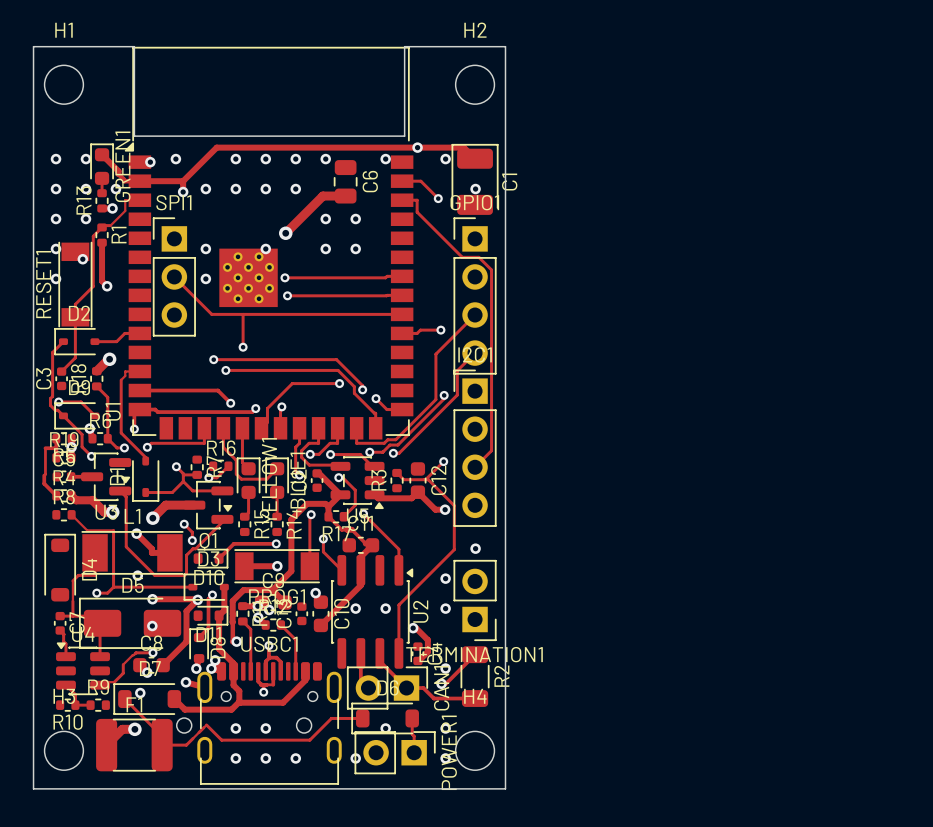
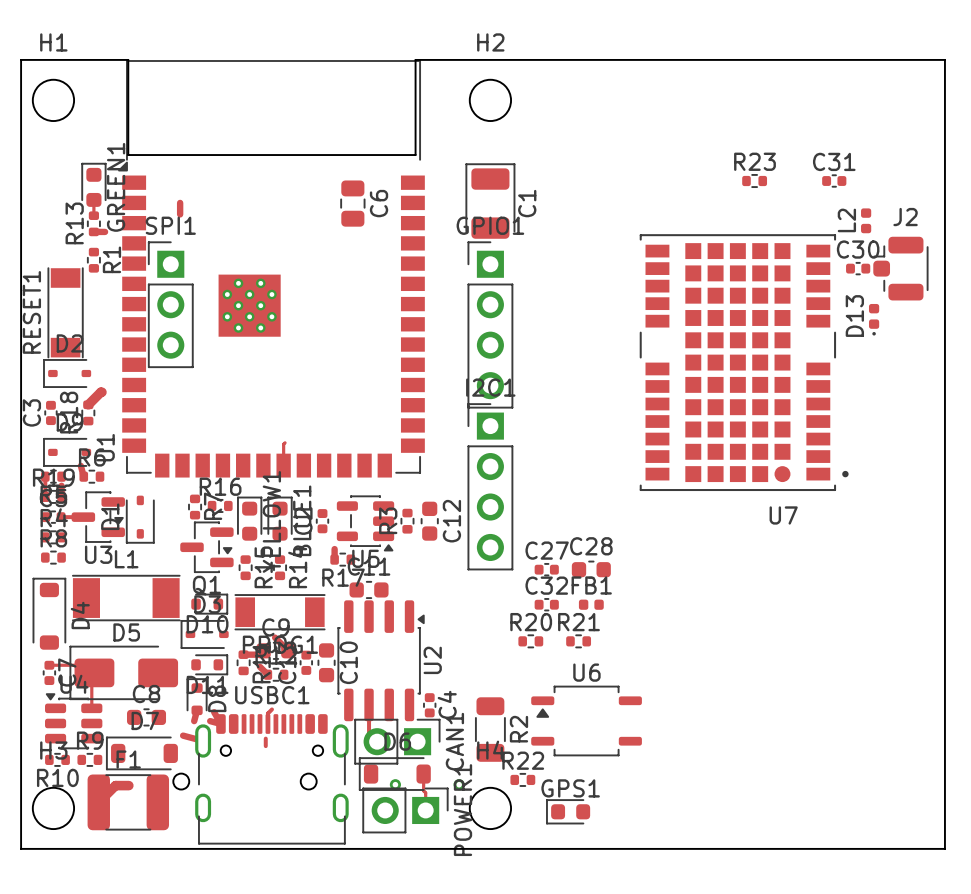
board edge: (505, 46) (505, 788) -> (522, 59) (944, 59) (944, 848) (522, 848)
via: (417, 147) -> none
track: (102, 154) (118, 171) (124, 181) (183, 181) (216, 147) (463, 147) (475, 158) -> none
via: (56, 159) -> none
via: (85, 159) -> none
via: (175, 159) -> none
via: (235, 159) -> none
via: (265, 159) -> none
via: (295, 159) -> none
via: (325, 159) -> none
via: (385, 159) -> none
via: (445, 159) -> none
R23: none -> (754, 181)
C31: none -> (834, 181)
via: (150, 162) -> none
track: (402, 181) (420, 181) (438, 198) -> none
via: (56, 189) -> none
via: (85, 189) -> none
via: (115, 189) -> none
via: (205, 189) -> none
via: (235, 189) -> none
via: (265, 189) -> none
via: (295, 189) -> none
via: (475, 189) -> none
via: (183, 192) -> none
track: (345, 196) (322, 196) (285, 233) -> none
via: (438, 198) -> none
L2: none -> (866, 220)
track: (139, 200) (125, 200) (125, 210) (110, 225) (103, 225) (93, 236) (93, 286) (75, 304) (75, 357) (61, 371) -> none
track: (402, 200) (417, 200) (417, 212) (462, 257) (478, 257) (491, 269) (491, 450) (475, 467) -> none
via: (112, 208) -> none
via: (56, 219) -> none
via: (85, 219) -> none
via: (325, 219) -> none
via: (355, 219) -> none
via: (285, 233) -> none
track: (102, 242) (102, 281) (107, 286) -> none
C30: none -> (858, 268)
J2: none -> (900, 268)
via: (56, 248) -> none
via: (205, 248) -> none
via: (265, 248) -> none
via: (325, 248) -> none
via: (355, 248) -> none
via: (82, 259) -> none
track: (174, 276) (211, 314) (402, 314) -> none
track: (402, 276) (284, 277) -> none
via: (284, 277) -> none
via: (56, 278) -> none
via: (205, 278) -> none
via: (107, 286) -> none
D13: none -> (874, 319)
via: (287, 295) -> none
track: (402, 295) (287, 295) -> none
track: (243, 314) (243, 347) -> none
track: (475, 315) (435, 354) (435, 399) (395, 439) (387, 439) (384, 443) (356, 443) (356, 428) -> none
track: (440, 330) (420, 330) (417, 333) (402, 333) -> none
via: (440, 330) -> none
U7: none -> (744, 362)
track: (139, 333) (124, 333) (116, 341) (94, 341) -> none
track: (63, 341) (52, 352) (52, 396) (50, 398) (50, 405) (82, 434) (82, 446) (91, 456) -> none
via: (243, 347) -> none
track: (475, 353) (457, 370) (457, 395) (399, 453) (393, 453) -> none
via: (109, 359) -> none
track: (213, 359) (336, 359) (362, 385) (362, 389) -> none
via: (213, 359) -> none
track: (225, 370) (338, 370) (354, 386) (354, 393) (375, 413) (375, 428) -> none
via: (225, 370) -> none
track: (139, 371) (125, 371) (125, 375) (121, 380) (121, 432) (145, 457) (145, 461) -> none
track: (339, 383) (292, 383) (267, 408) (267, 422) (261, 428) -> none
via: (339, 383) -> none
track: (96, 386) (107, 397) (107, 438) (117, 447) (124, 447) -> none
via: (362, 389) -> none
track: (139, 390) (217, 390) (230, 403) -> none
track: (444, 395) (444, 398) (397, 445) (389, 445) (382, 452) (369, 452) -> none
via: (444, 395) -> none
track: (376, 398) (386, 409) (402, 409) -> none
via: (376, 398) -> none
track: (58, 402) (81, 402) (94, 415) -> none
via: (58, 402) -> none
via: (230, 403) -> none
via: (281, 406) -> none
track: (255, 408) (252, 412) (157, 412) (155, 409) (139, 409) (134, 415) (134, 429) -> none
via: (255, 408) -> none
via: (89, 428) -> none
track: (204, 428) (204, 443) (151, 443) (147, 447) -> none
track: (223, 428) (223, 447) (236, 460) (236, 474) (241, 479) (266, 479) (277, 468) -> none
track: (242, 428) (242, 462) (248, 468) -> none
track: (299, 428) (299, 443) (295, 447) (295, 471) (299, 475) -> none
track: (318, 428) (318, 443) (309, 443) (301, 450) (301, 457) (309, 465) (340, 466) -> none
track: (337, 428) (337, 443) (330, 443) (319, 454) (310, 454) -> none
via: (134, 429) -> none
via: (71, 447) -> none
via: (124, 447) -> none
via: (147, 447) -> none
track: (56, 448) (45, 448) (44, 483) (56, 495) -> none
via: (369, 452) -> none
via: (393, 453) -> none
via: (310, 454) -> none
track: (330, 454) (360, 454) (372, 466) (374, 466) -> none
via: (330, 454) -> none
via: (91, 456) -> none
track: (443, 461) (424, 479) -> none
via: (443, 461) -> none
track: (176, 466) (183, 473) (183, 481) -> none
via: (176, 466) -> none
track: (228, 466) (216, 477) (208, 477) -> none
track: (397, 472) (403, 479) (428, 479) (454, 505) (454, 549) (398, 605) (398, 653) -> none
track: (317, 473) (340, 494) (328, 506) (325, 503) (307, 503) (291, 519) (291, 571) (272, 590) (243, 590) (232, 601) (232, 622) -> none
track: (183, 474) (197, 474) -> none
via: (299, 475) -> none
via: (208, 477) -> none
track: (338, 477) (342, 477) (355, 490) (355, 505) (343, 516) -> none
via: (338, 477) -> none
track: (183, 481) (192, 490) (222, 490) -> none
track: (183, 481) (172, 492) (145, 492) -> none
track: (120, 491) (126, 497) (126, 546) (154, 575) (184, 575) (186, 573) (186, 555) (192, 548) (195, 548) (222, 522) (222, 519) -> none
track: (248, 492) (248, 512) (244, 516) -> none
track: (277, 492) (277, 516) -> none
track: (374, 494) (378, 498) (411, 498) (417, 492) (435, 509) (445, 509) -> none
track: (71, 495) (76, 500) (92, 500) (104, 512) (112, 512) -> none
track: (194, 505) (165, 505) (152, 518) -> none
via: (445, 509) -> none
via: (112, 512) -> none
track: (363, 513) (398, 549) (398, 570) -> none
via: (363, 513) -> none
track: (71, 514) (87, 530) (113, 530) (113, 587) -> none
track: (311, 514) (309, 566) -> none
via: (311, 514) -> none
track: (328, 516) (341, 529) (347, 529) -> none
via: (152, 518) -> none
track: (184, 524) (192, 532) (192, 540) -> none
via: (184, 524) -> none
C27: none -> (546, 569)
C28: none -> (591, 569)
track: (347, 529) (351, 529) (365, 543) (372, 545) (360, 556) (360, 585) (320, 625) -> none
track: (136, 533) (151, 548) (151, 552) (169, 552) -> none
via: (136, 533) -> none
track: (323, 538) (323, 551) (341, 570) -> none
via: (323, 538) -> none
via: (192, 540) -> none
track: (276, 543) (233, 543) (219, 558) -> none
via: (276, 543) -> none
via: (475, 548) -> none
track: (95, 552) (95, 575) (78, 575) (72, 580) (72, 616) -> none
C32: none -> (546, 604)
FB1: none -> (591, 604)
track: (244, 566) (277, 566) -> none
via: (277, 566) -> none
via: (137, 575) -> none
via: (445, 578) -> none
track: (113, 587) (107, 593) (96, 593) -> none
track: (113, 587) (192, 587) -> none
track: (224, 587) (224, 610) (219, 615) (219, 648) (233, 663) (233, 685) (239, 691) (239, 701) -> none
via: (96, 593) -> none
via: (315, 593) -> none
R20: none -> (530, 641)
R21: none -> (578, 641)
track: (212, 595) (208, 598) (208, 628) (199, 637) -> none
via: (212, 595) -> none
track: (152, 599) (197, 599) (186, 611) (186, 641) (163, 665) -> none
via: (152, 599) -> none
via: (197, 599) -> none
TERMINATION1: (475, 600) -> none
via: (257, 606) -> none
via: (355, 608) -> none
via: (385, 608) -> none
via: (445, 608) -> none
via: (269, 609) -> none
via: (258, 617) -> none
track: (242, 621) (250, 629) (250, 671) -> none
track: (232, 622) (232, 641) (236, 641) -> none
track: (280, 625) (295, 639) (295, 671) -> none
via: (152, 626) -> none
track: (413, 628) (416, 628) (427, 640) (427, 651) (417, 660) -> none
via: (413, 628) -> none
track: (60, 630) (64, 634) (65, 656) -> none
via: (236, 641) -> none
track: (268, 645) (268, 657) (276, 657) (280, 661) (280, 671) -> none
via: (268, 645) -> none
track: (153, 652) (136, 652) (123, 664) (123, 673) (114, 682) (103, 682) (100, 685) -> none
via: (153, 652) -> none
track: (379, 653) (379, 661) (406, 688) (423, 688) (433, 698) (475, 698) -> none
track: (475, 654) (445, 683) (441, 683) -> none
via: (215, 660) -> none
via: (196, 668) -> none
via: (211, 668) -> none
via: (445, 668) -> none
U6: none -> (586, 720)
track: (258, 671) (258, 681) (261, 685) (266, 685) -> none
track: (273, 671) (273, 684) (267, 684) -> none
track: (305, 671) (305, 680) (283, 702) (239, 701) -> none
via: (147, 672) -> none
via: (185, 682) -> none
via: (441, 683) -> none
track: (65, 685) (75, 694) (75, 705) (90, 705) -> none
via: (263, 692) -> none
via: (140, 693) -> none
track: (124, 699) (162, 736) (162, 745) (186, 745) (206, 725) (221, 740) (309, 740) (331, 718) (362, 718) -> none
track: (174, 699) (184, 709) (231, 709) (239, 701) -> none
R22: none -> (522, 779)
via: (235, 728) -> none
via: (265, 728) -> none
via: (134, 729) -> none
GPS1: none -> (568, 811)
via: (235, 758) -> none
via: (265, 758) -> none
via: (295, 758) -> none
via: (355, 758) -> none
via: (445, 758) -> none

